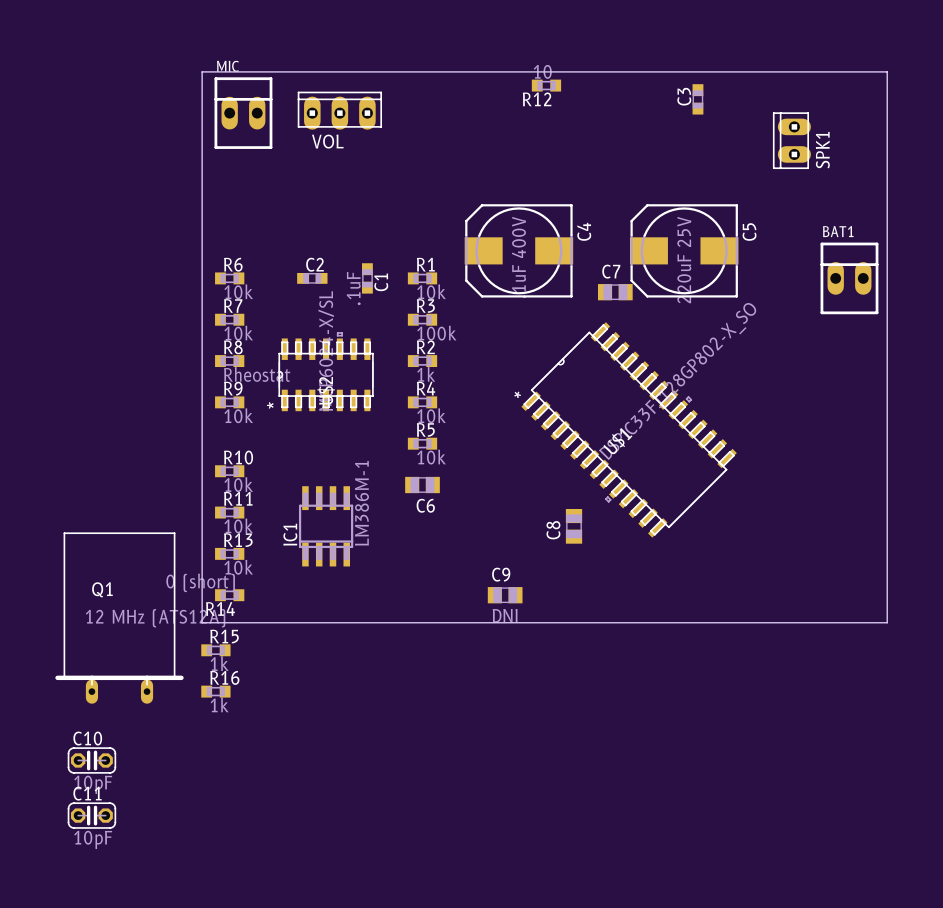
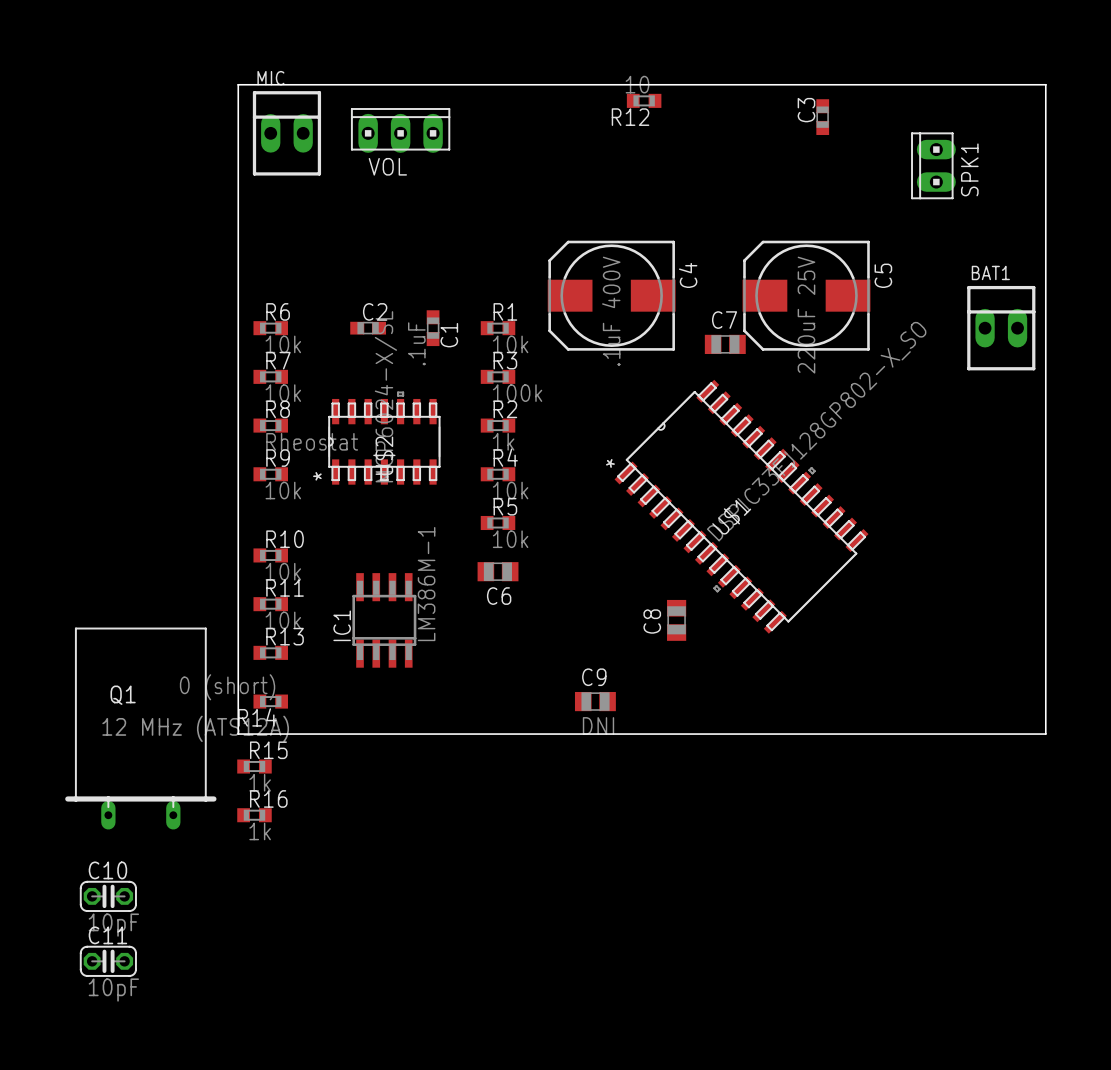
R13 value: 10k (238, 567) -> none

